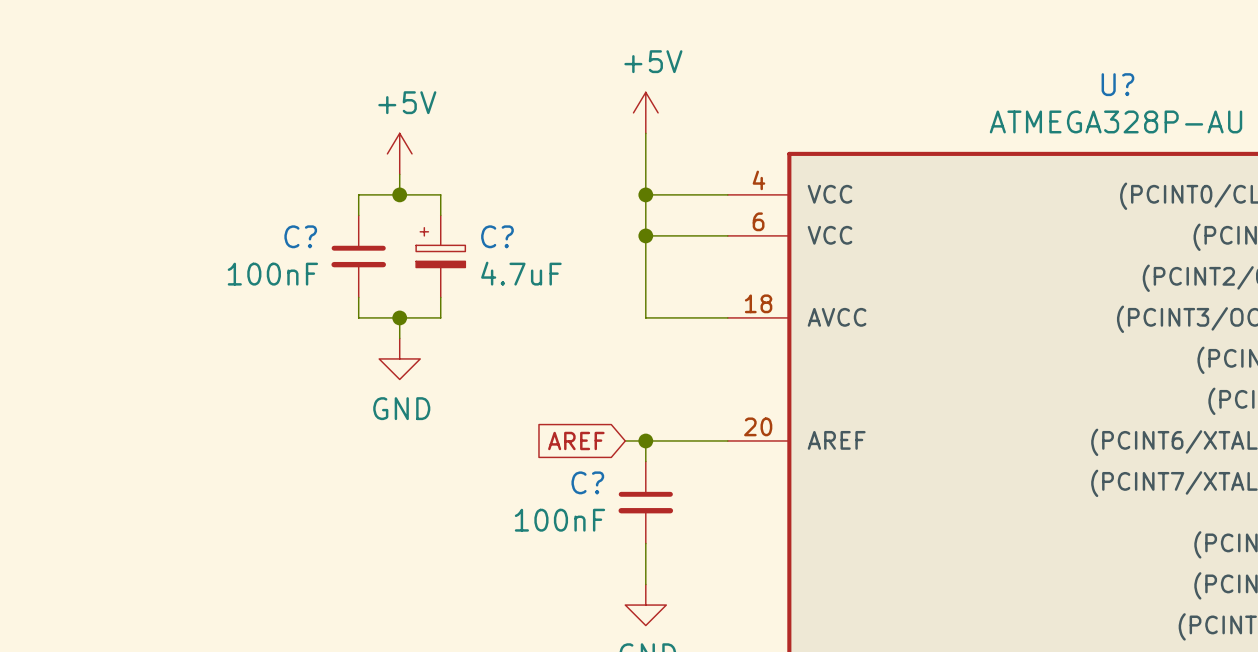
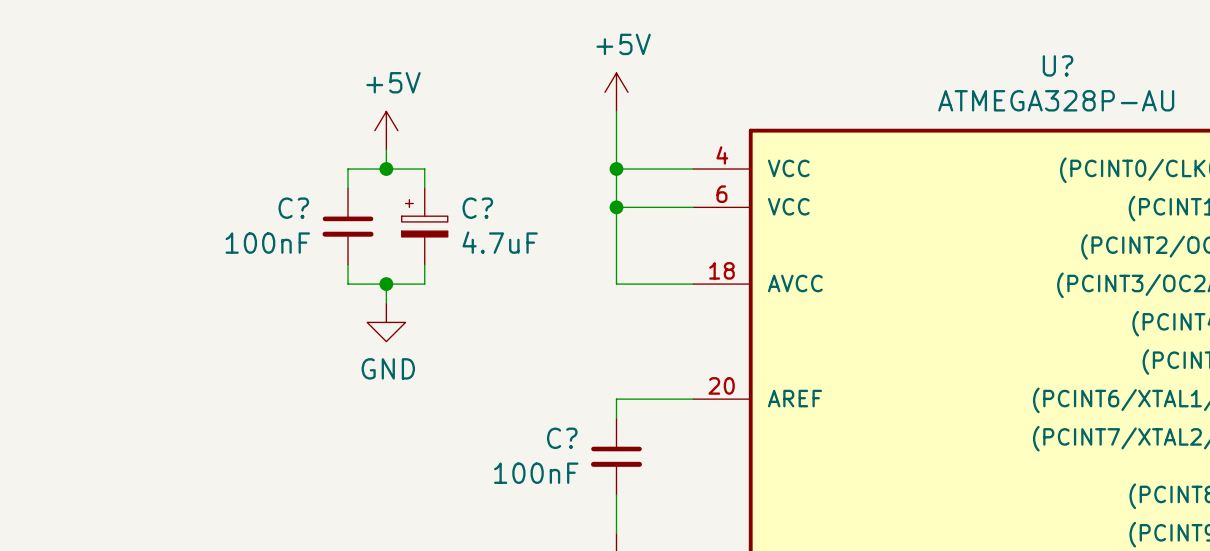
global label: AREF (576, 440) -> none
wire: (625, 440) (645, 440) -> none
junction: (645, 440) -> none

